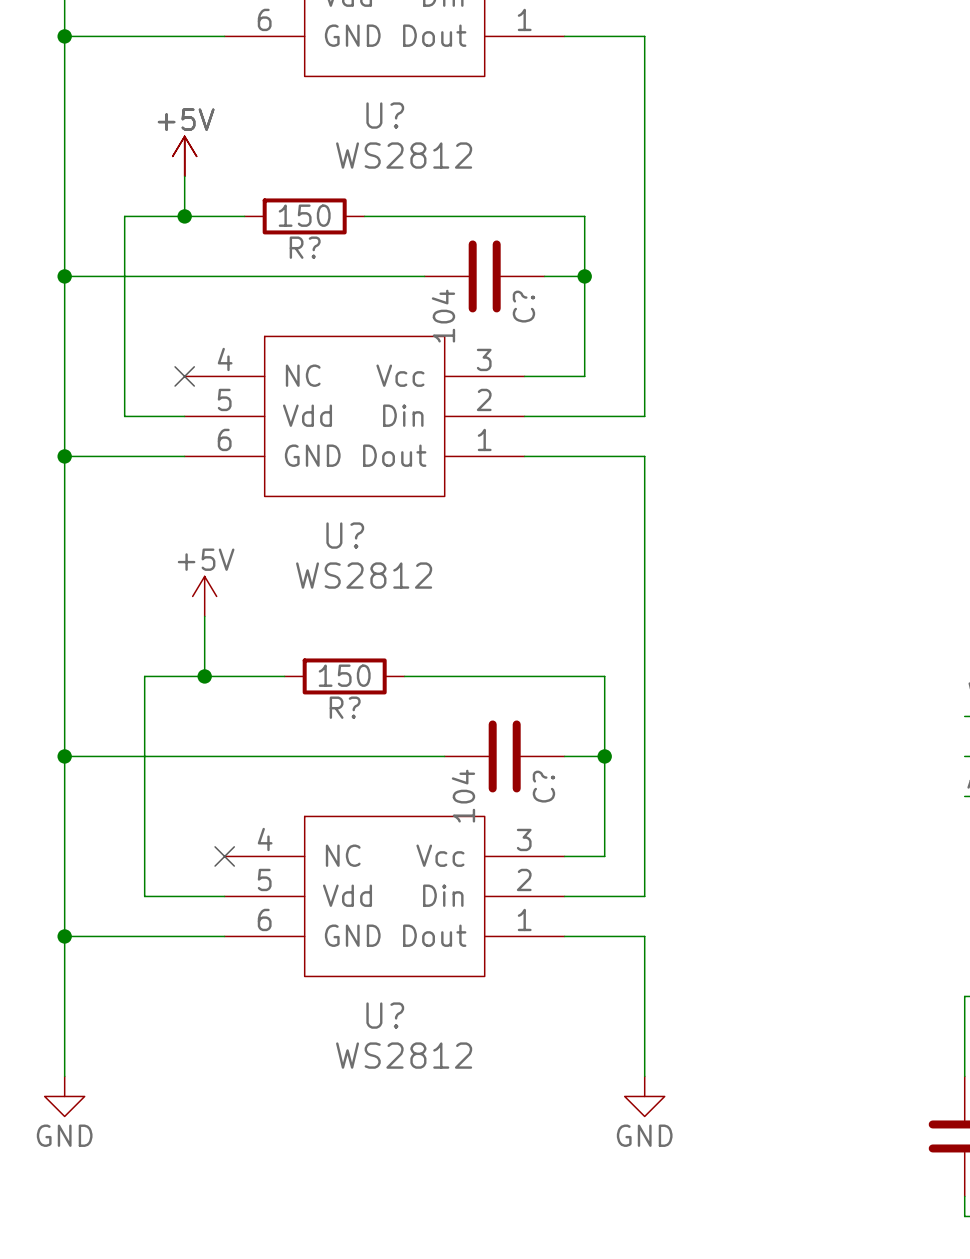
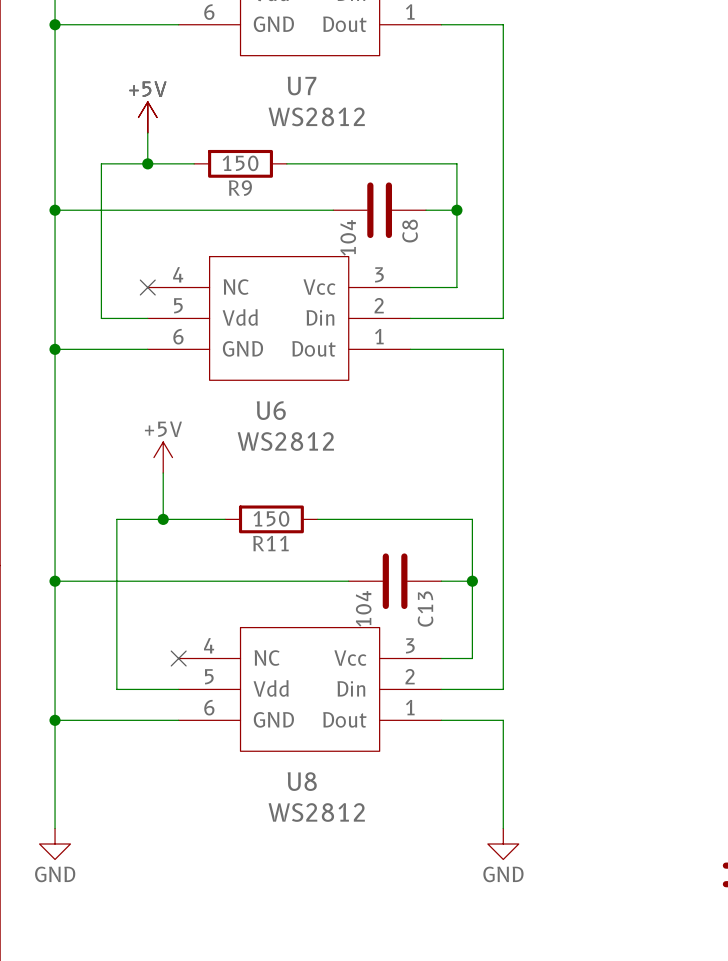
U? name: U? (385, 115) -> U7 (302, 85)
R? name: R? (305, 247) -> R9 (240, 188)
C? name: C? (523, 306) -> C8 (410, 231)
U? name: U? (345, 535) -> U6 (271, 410)
R? name: R? (345, 707) -> R11 (270, 543)
C? name: C? (543, 786) -> C13 (425, 609)
U? name: U? (385, 1015) -> U8 (302, 781)

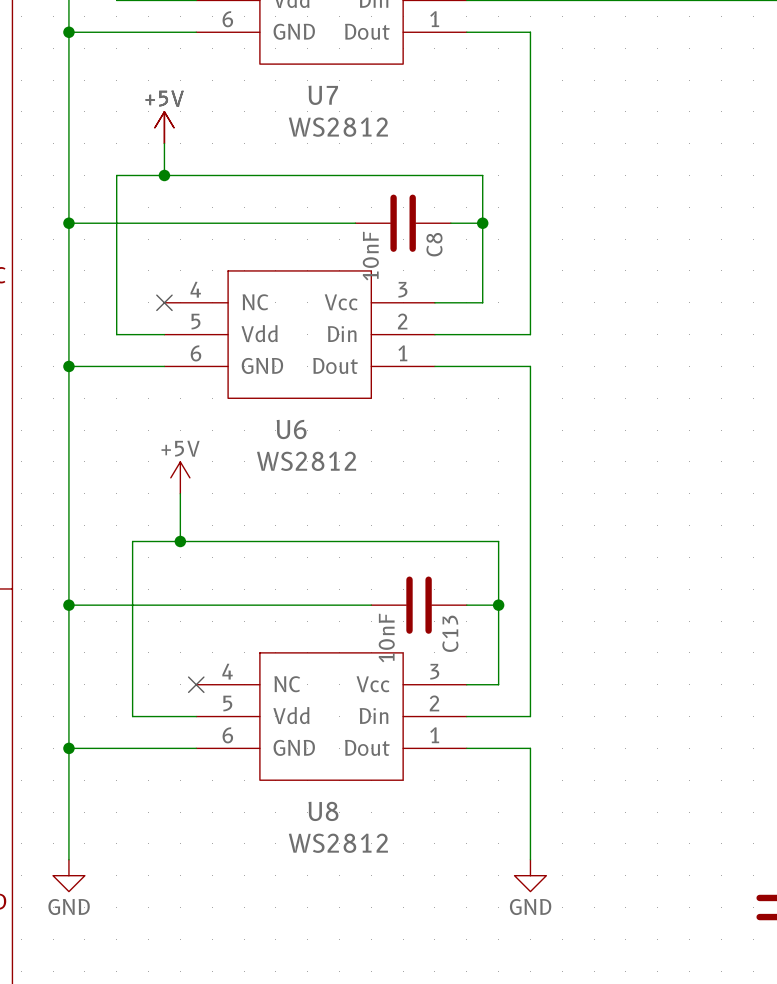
wire: none -> (212, 175) (307, 175)
R9: 150 (240, 163) -> none
C8 value: 104 (348, 237) -> 10nF (370, 256)
wire: none -> (244, 541) (339, 541)
R11: 150 (271, 519) -> none
C13 value: 104 (363, 608) -> 10nF (386, 638)

